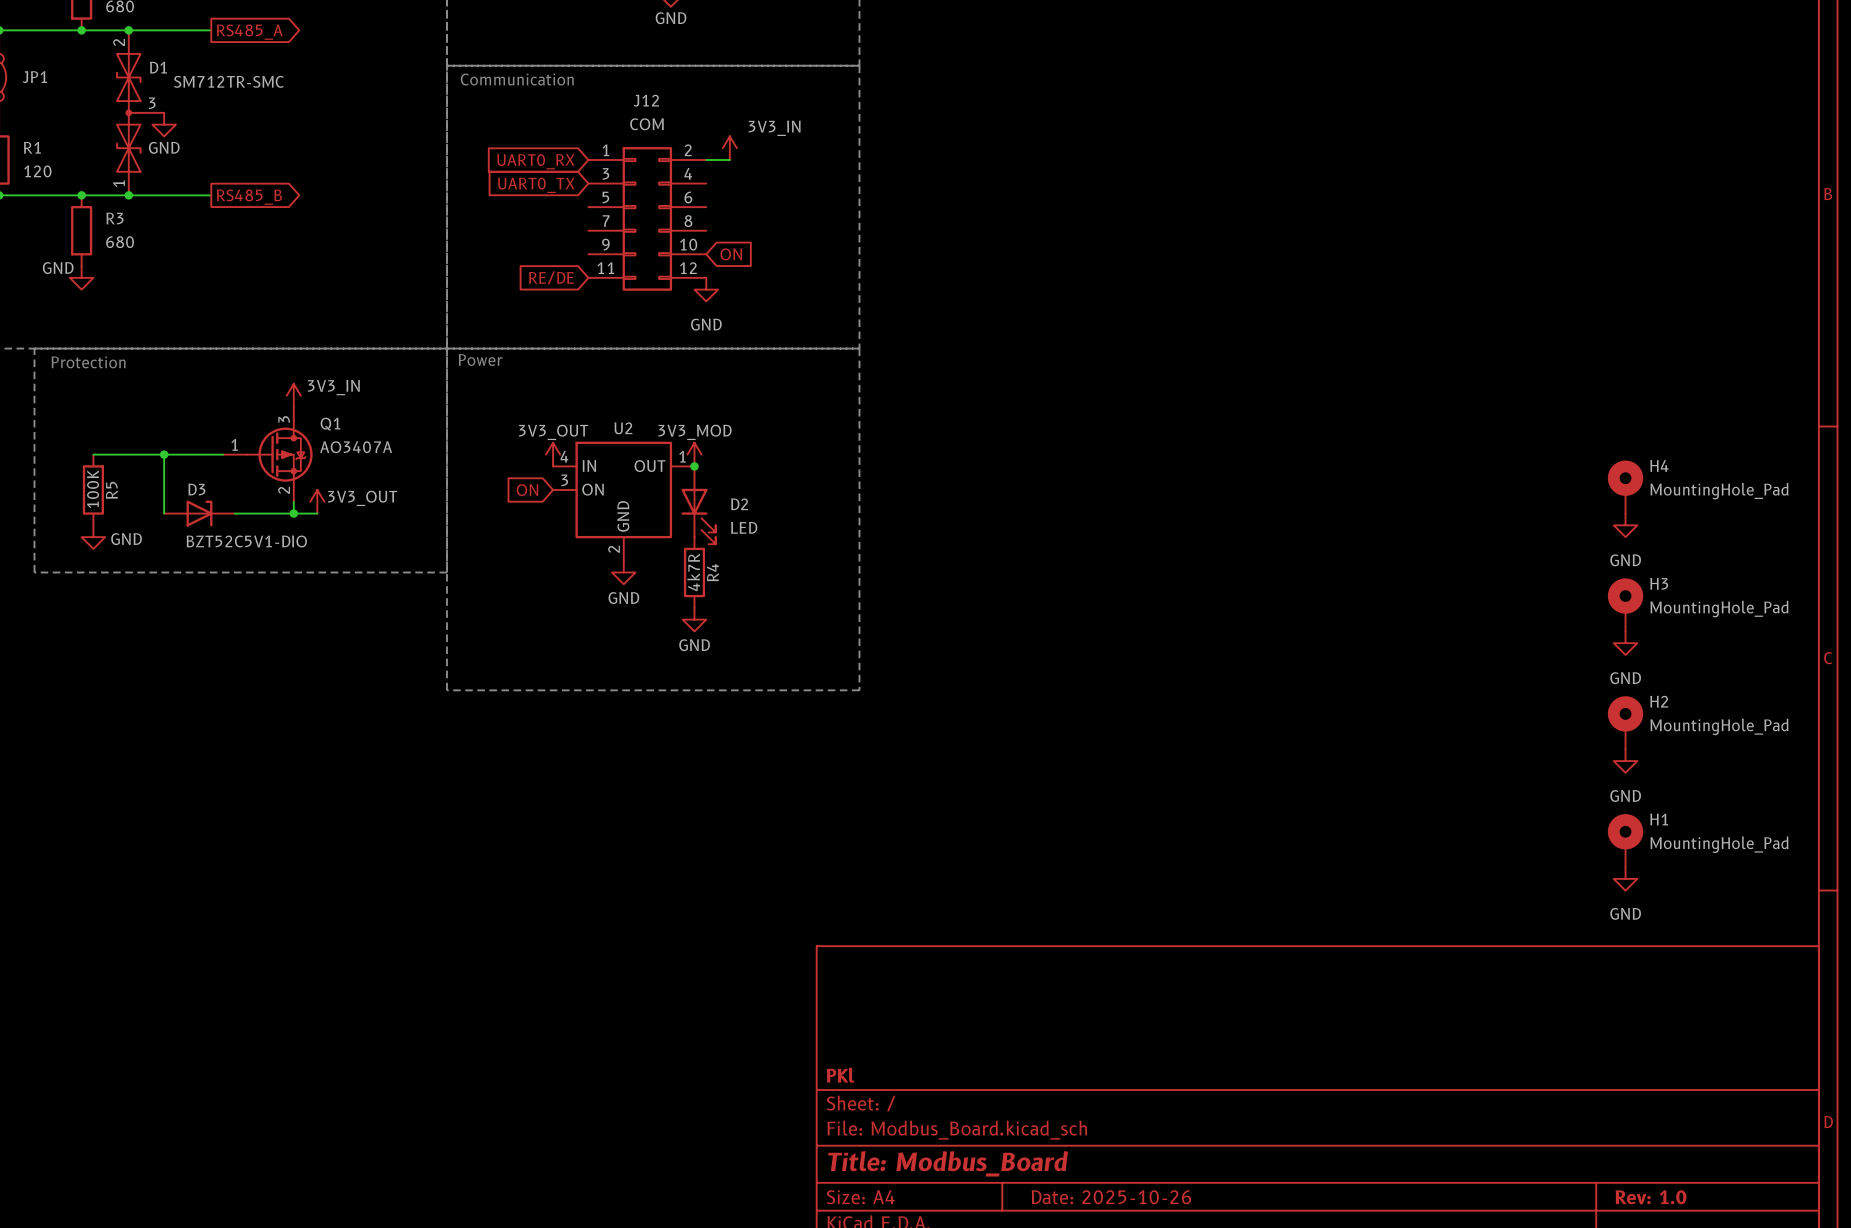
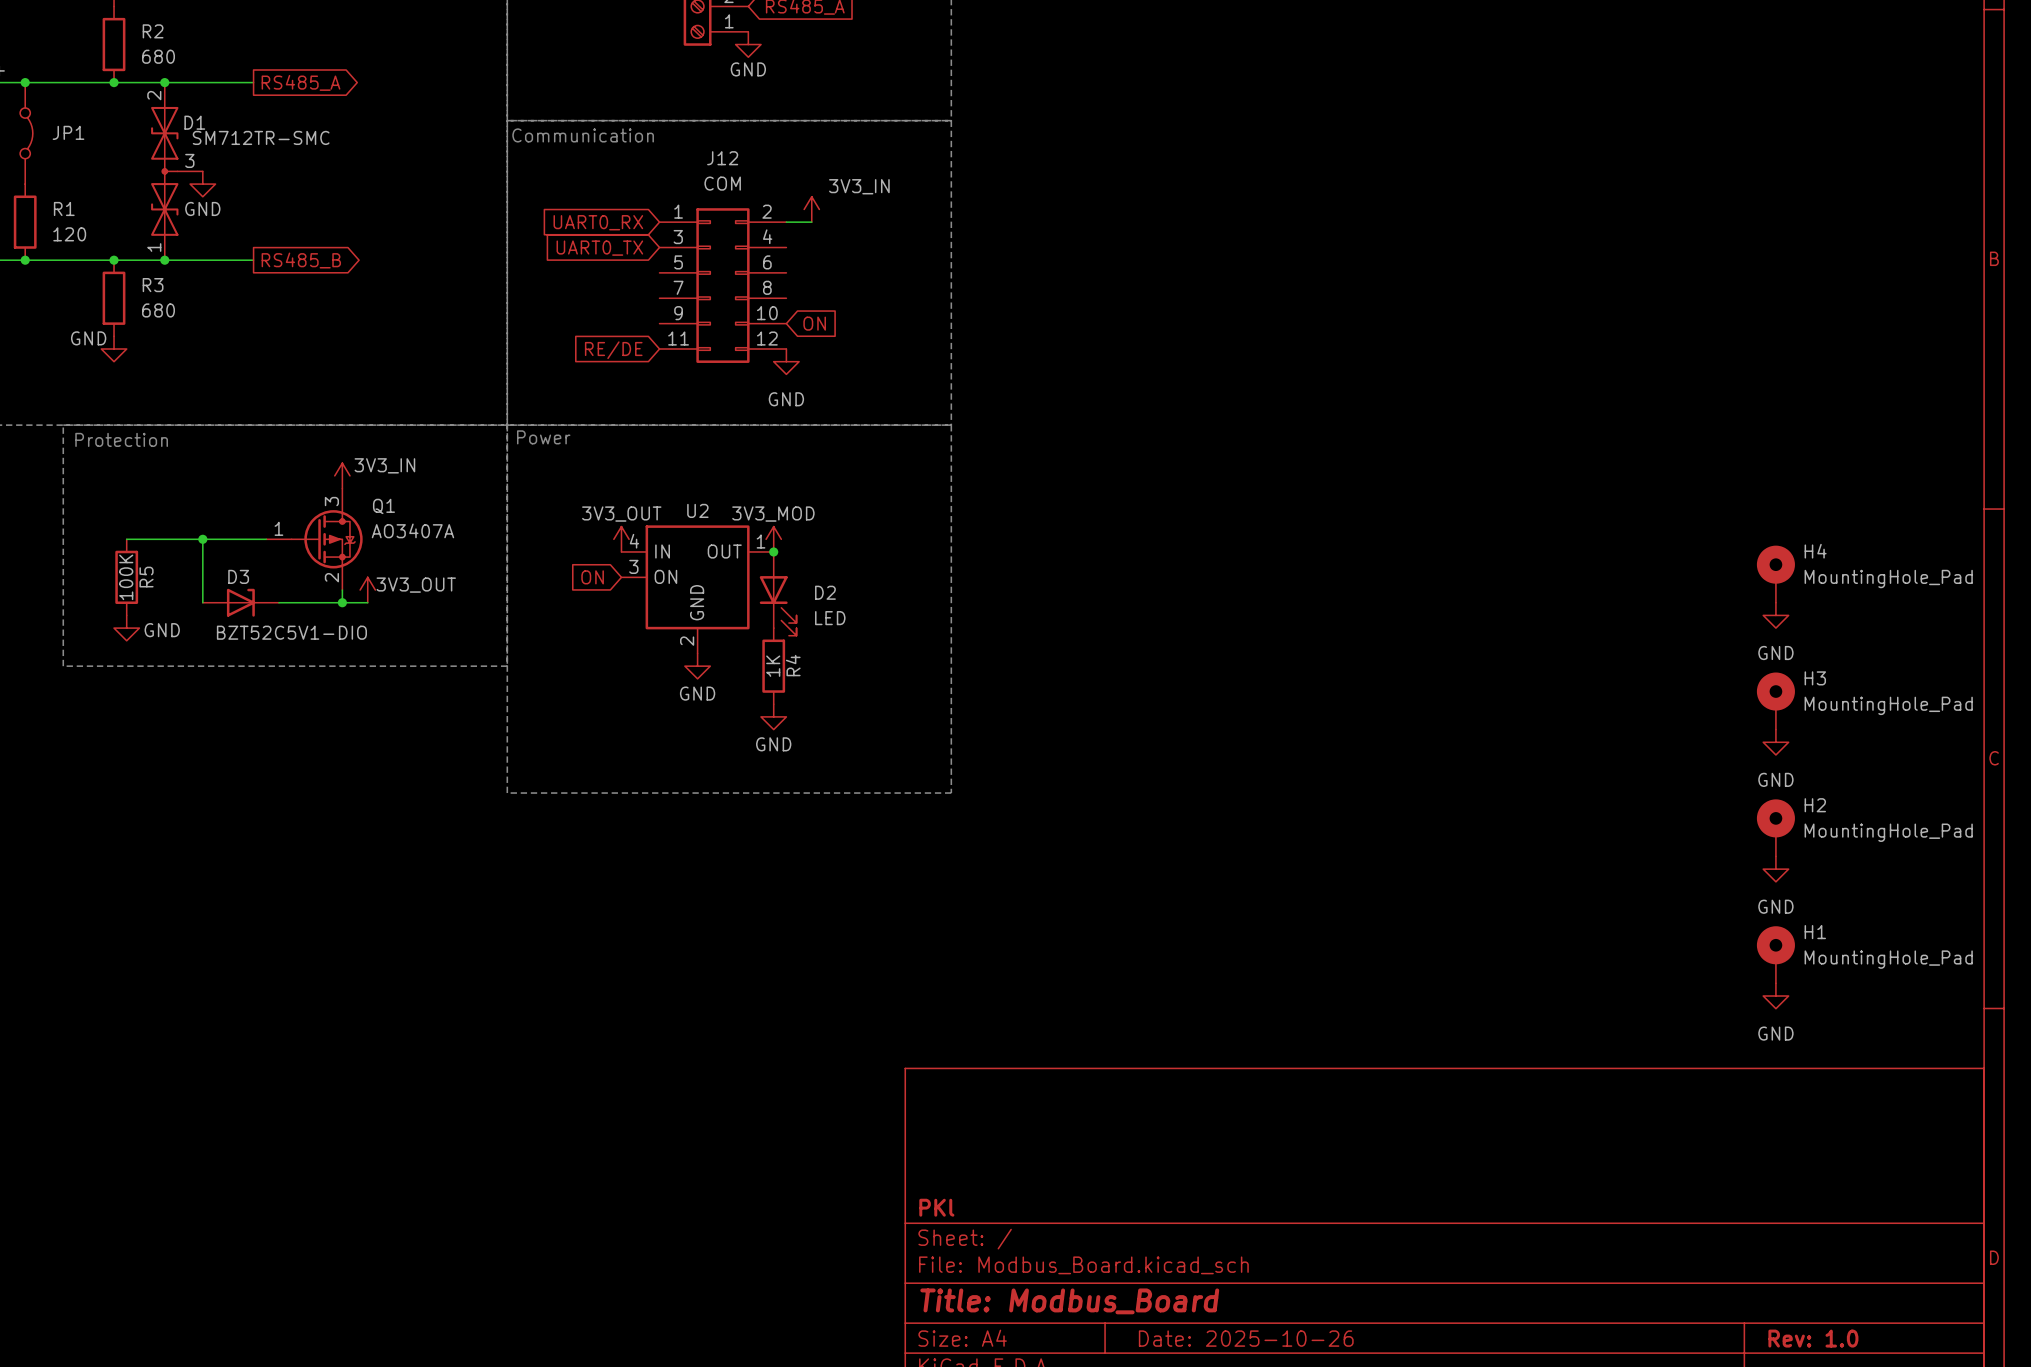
R4 value: 4k7R (693, 572) -> 1K (773, 666)

